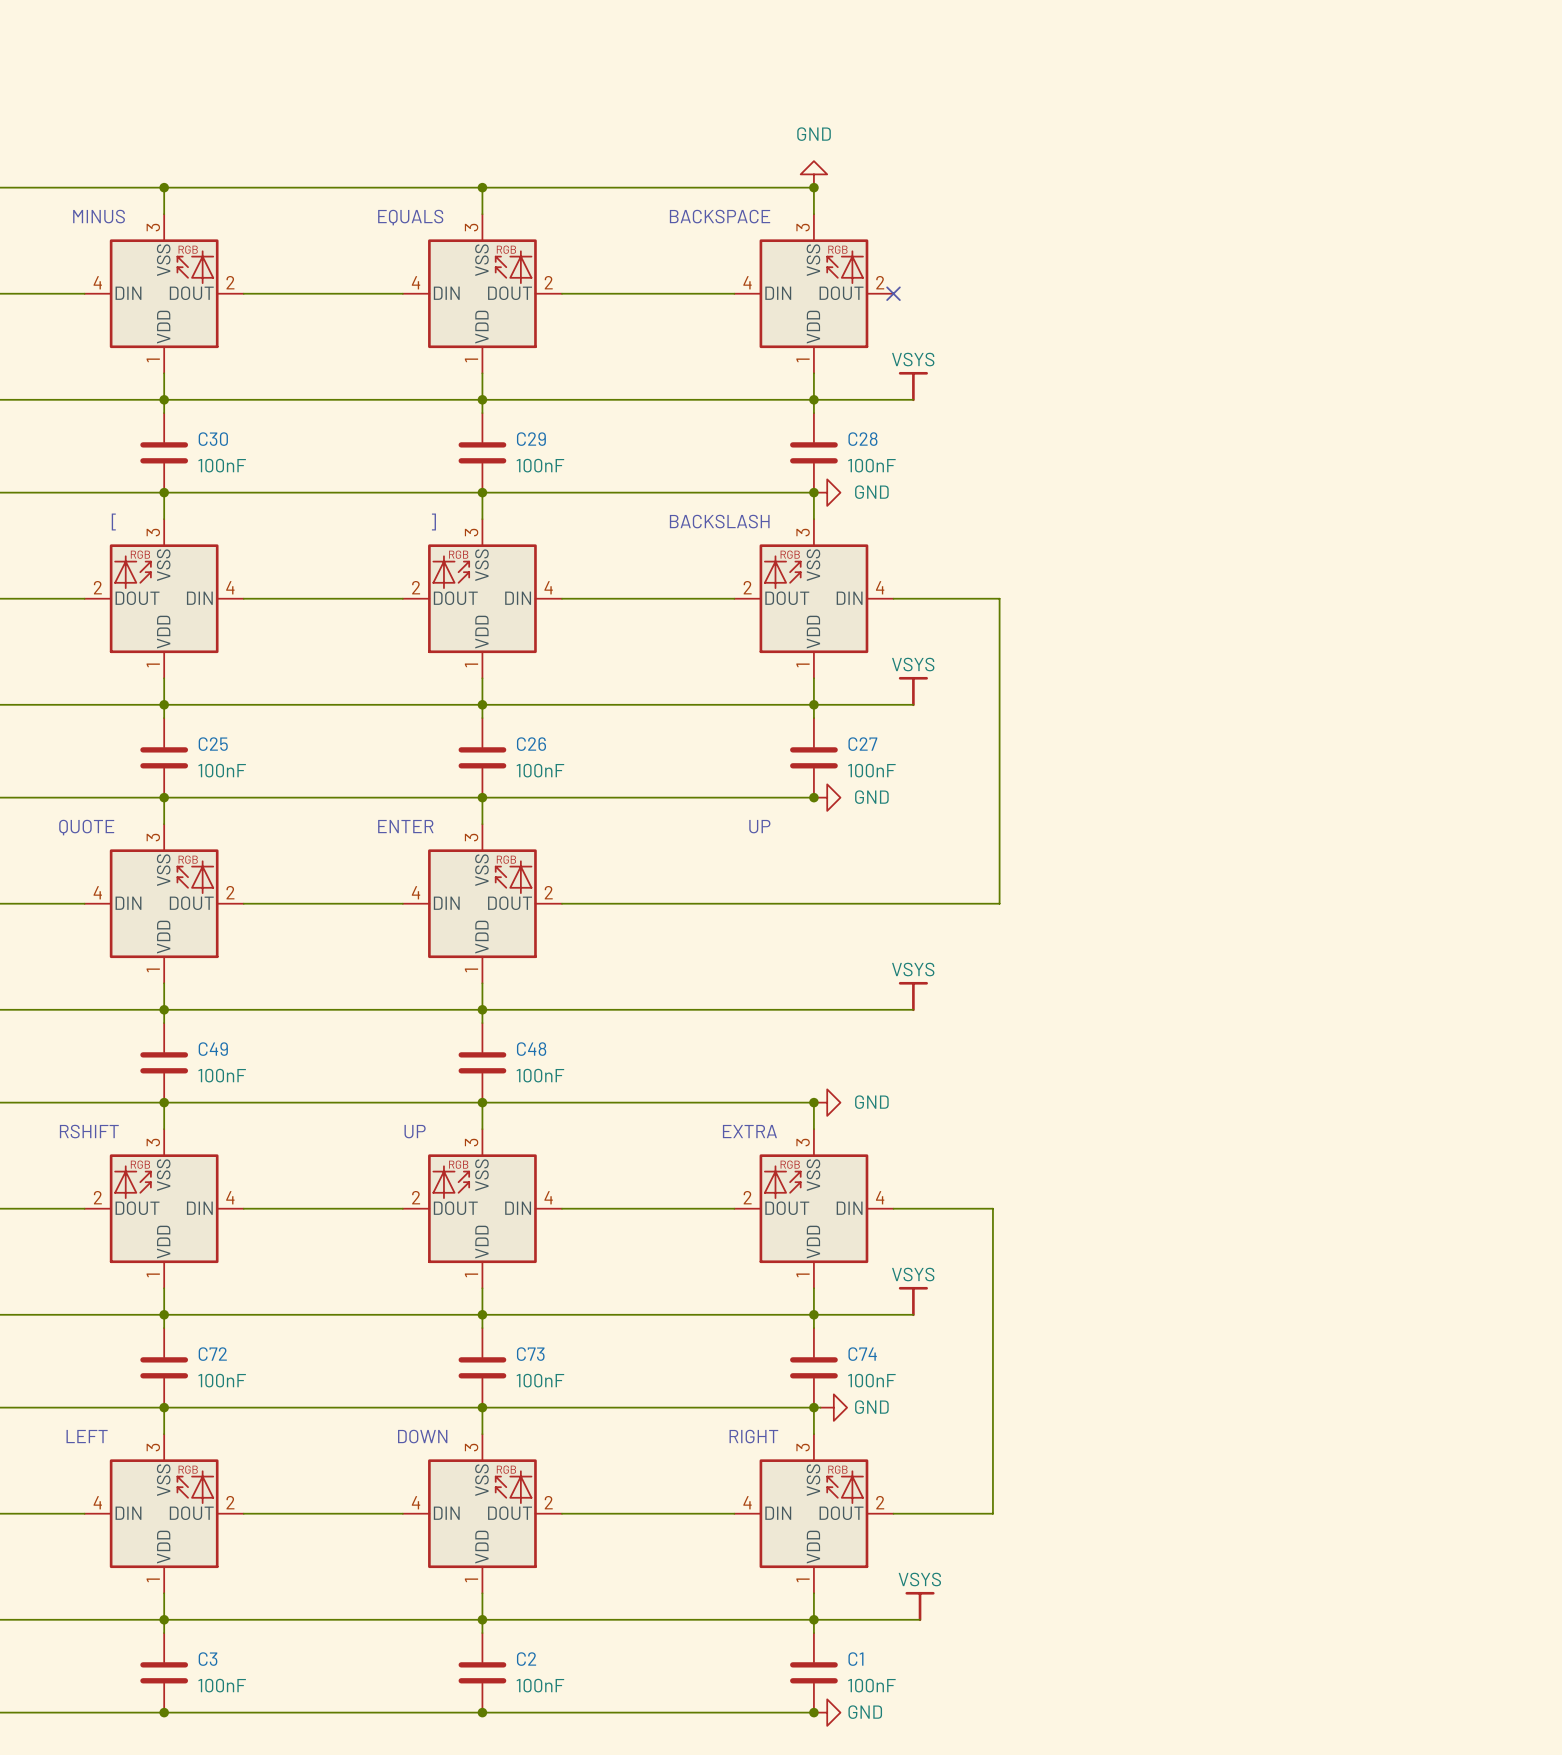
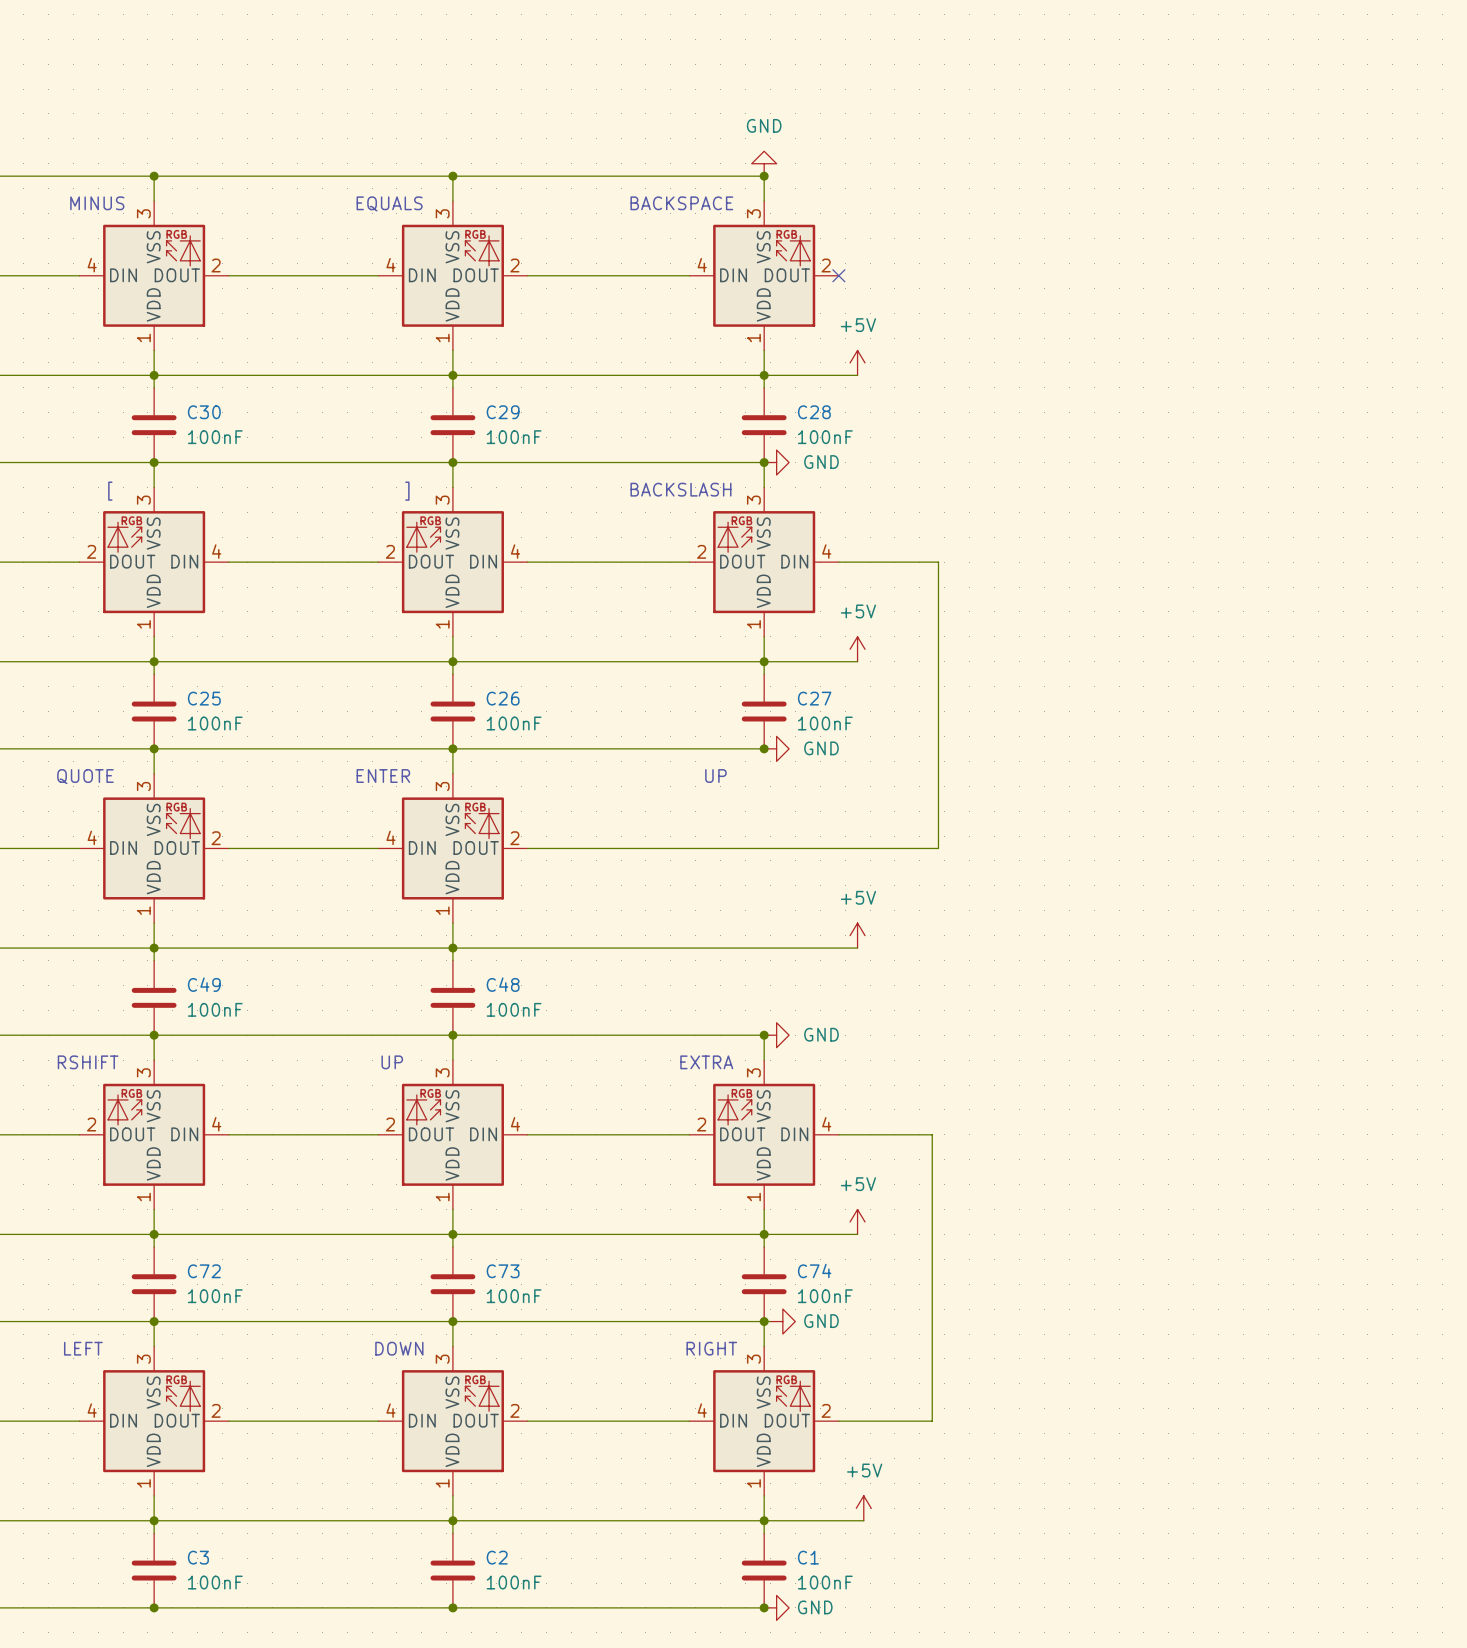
power symbol: VSYS (913, 386) -> +5V (857, 362)
power symbol: VSYS (913, 691) -> +5V (857, 649)
power symbol: VSYS (913, 996) -> +5V (857, 935)
power symbol: VSYS (913, 1301) -> +5V (857, 1221)
power symbol: VSYS (920, 1606) -> +5V (863, 1508)

